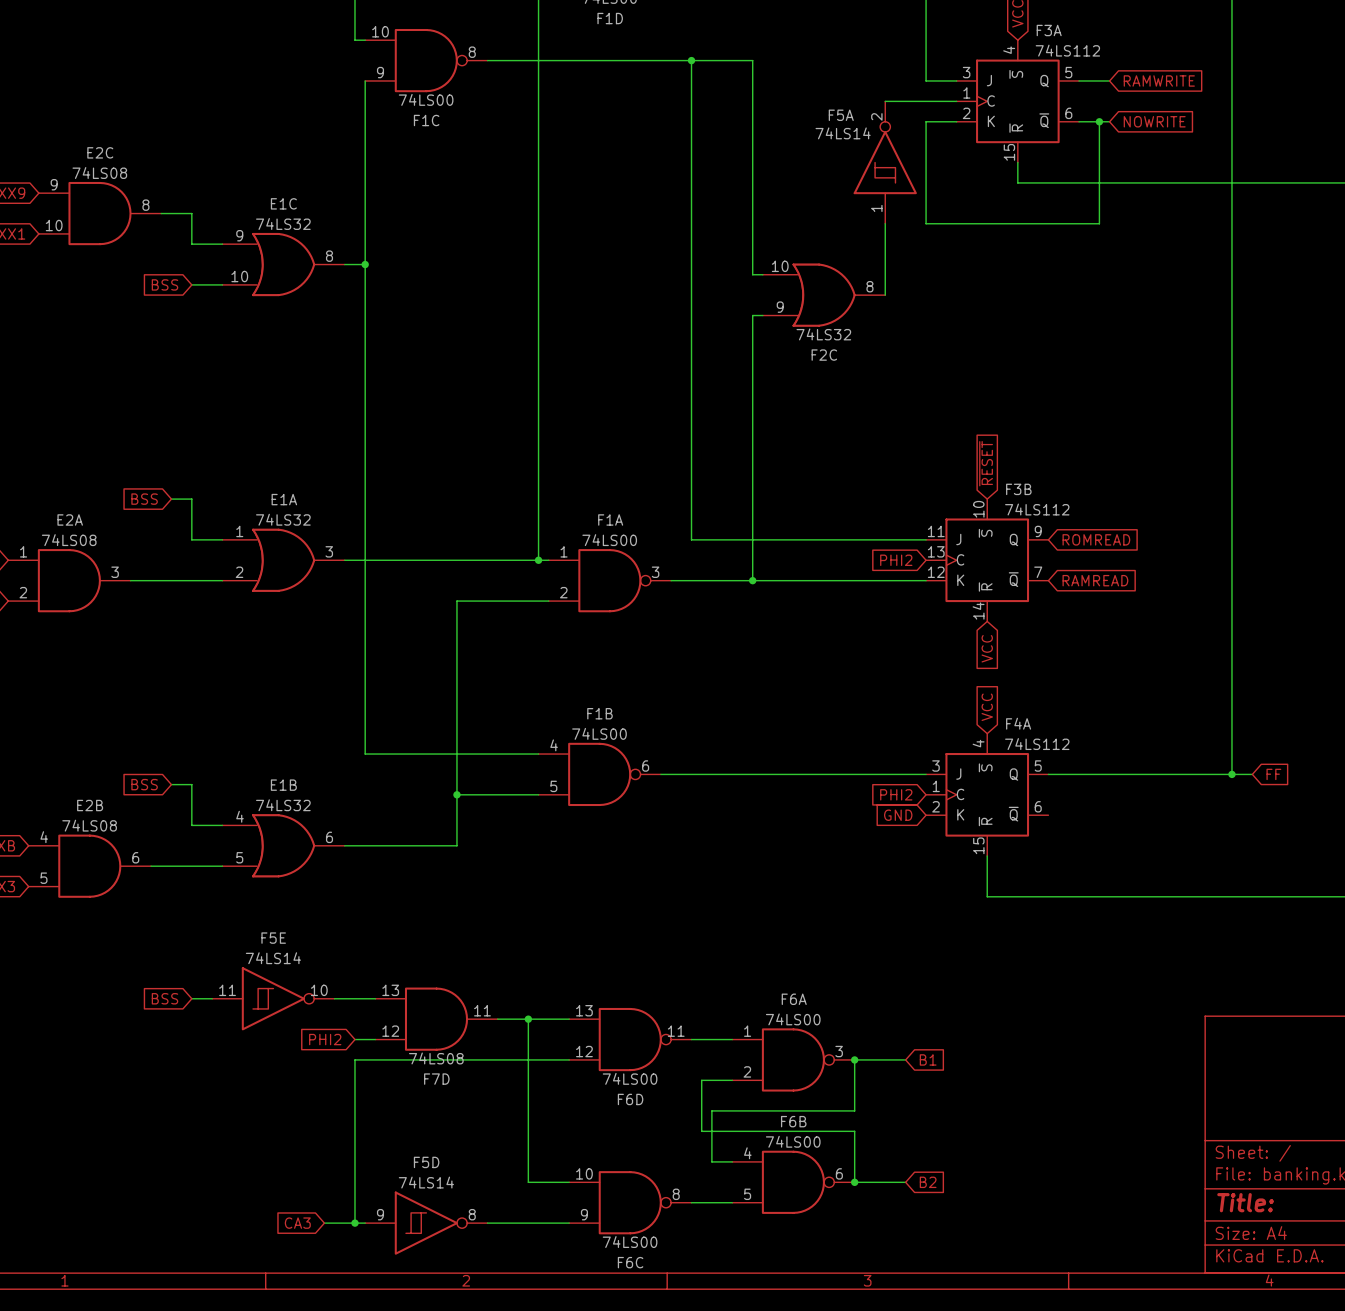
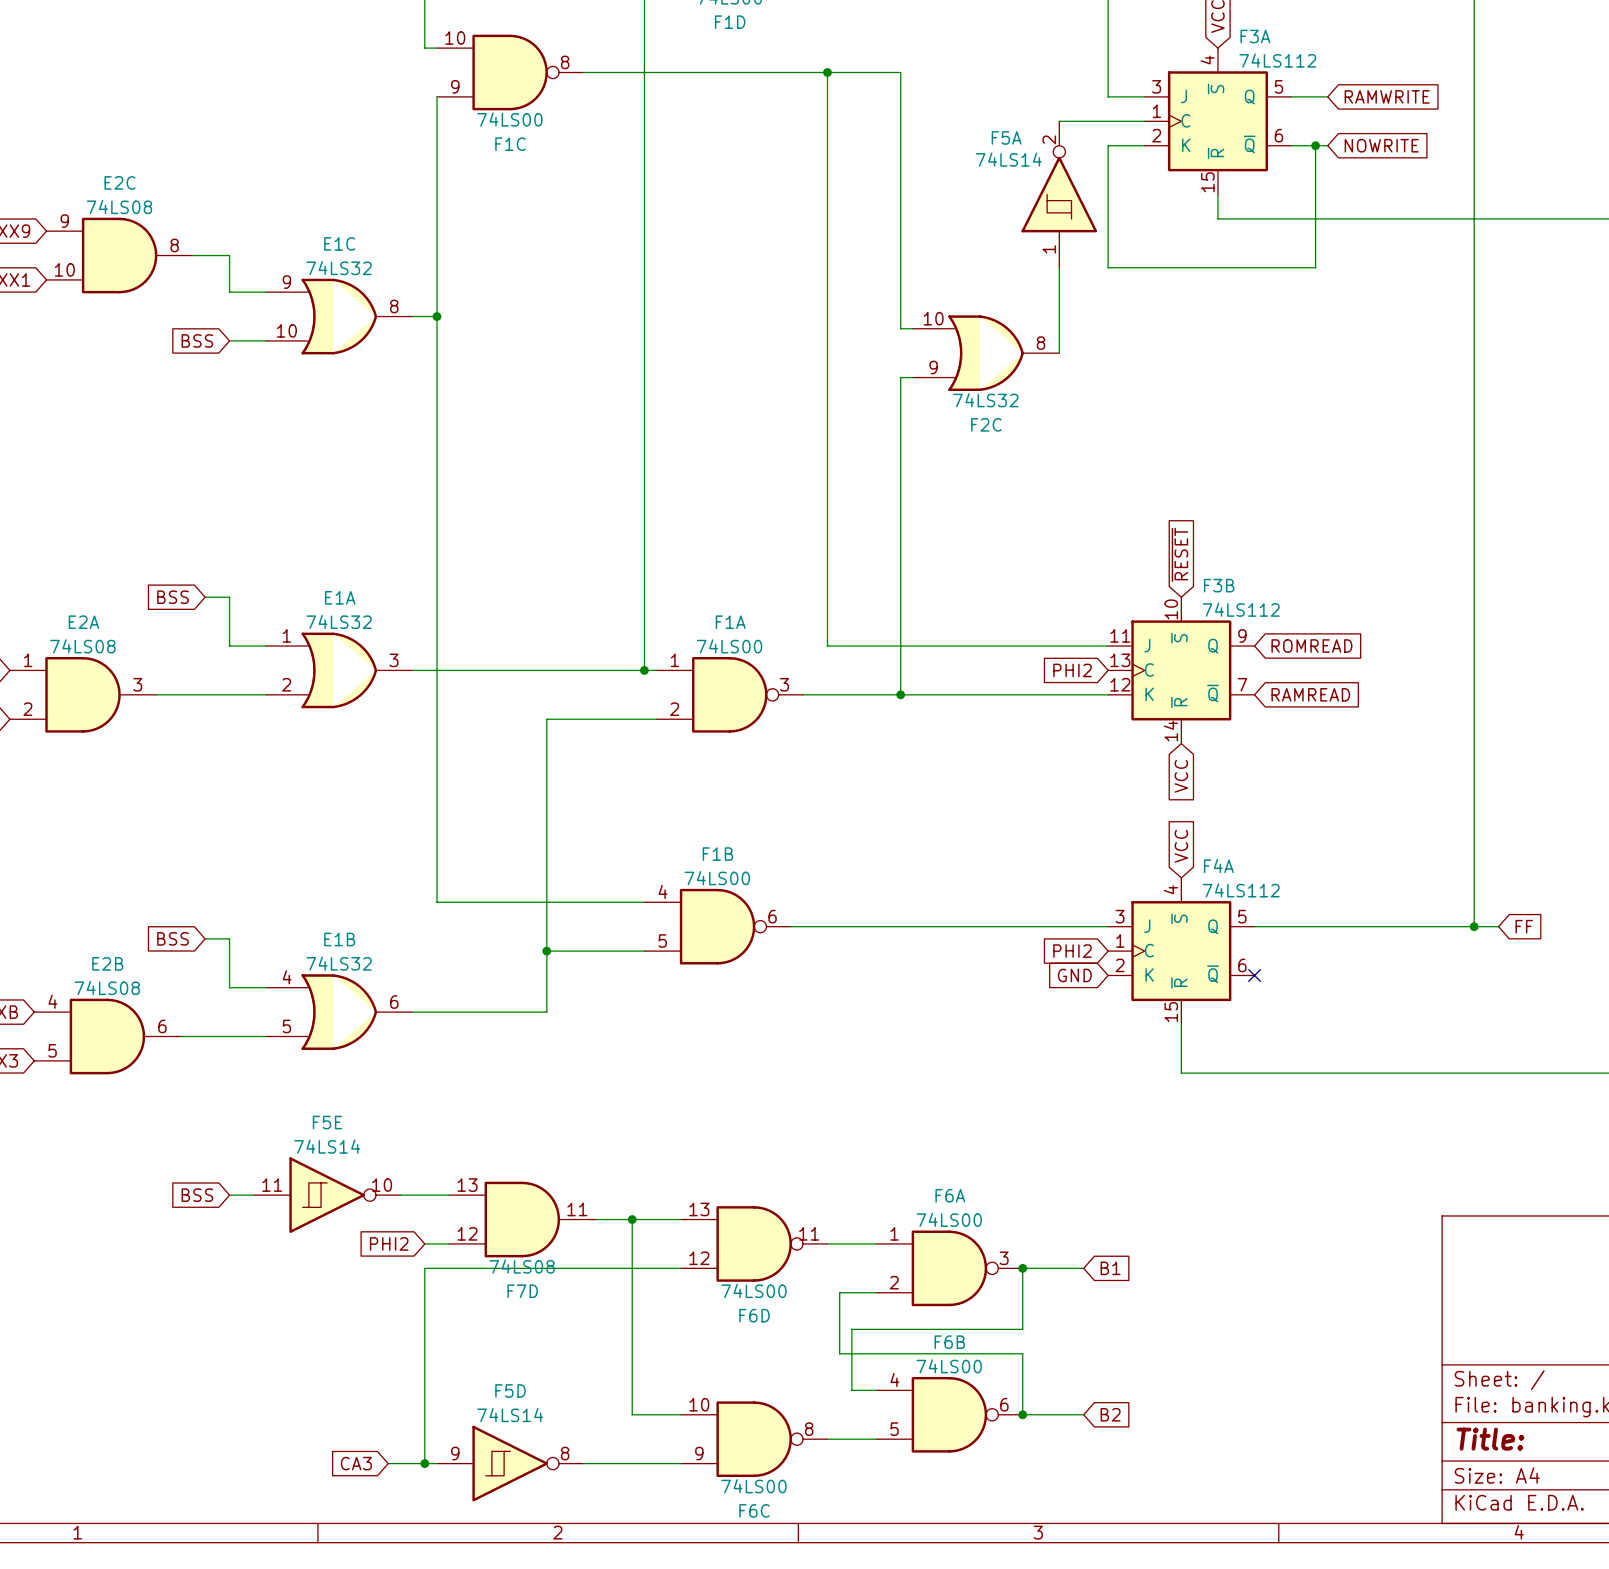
no-connect mark: none -> (1254, 975)

